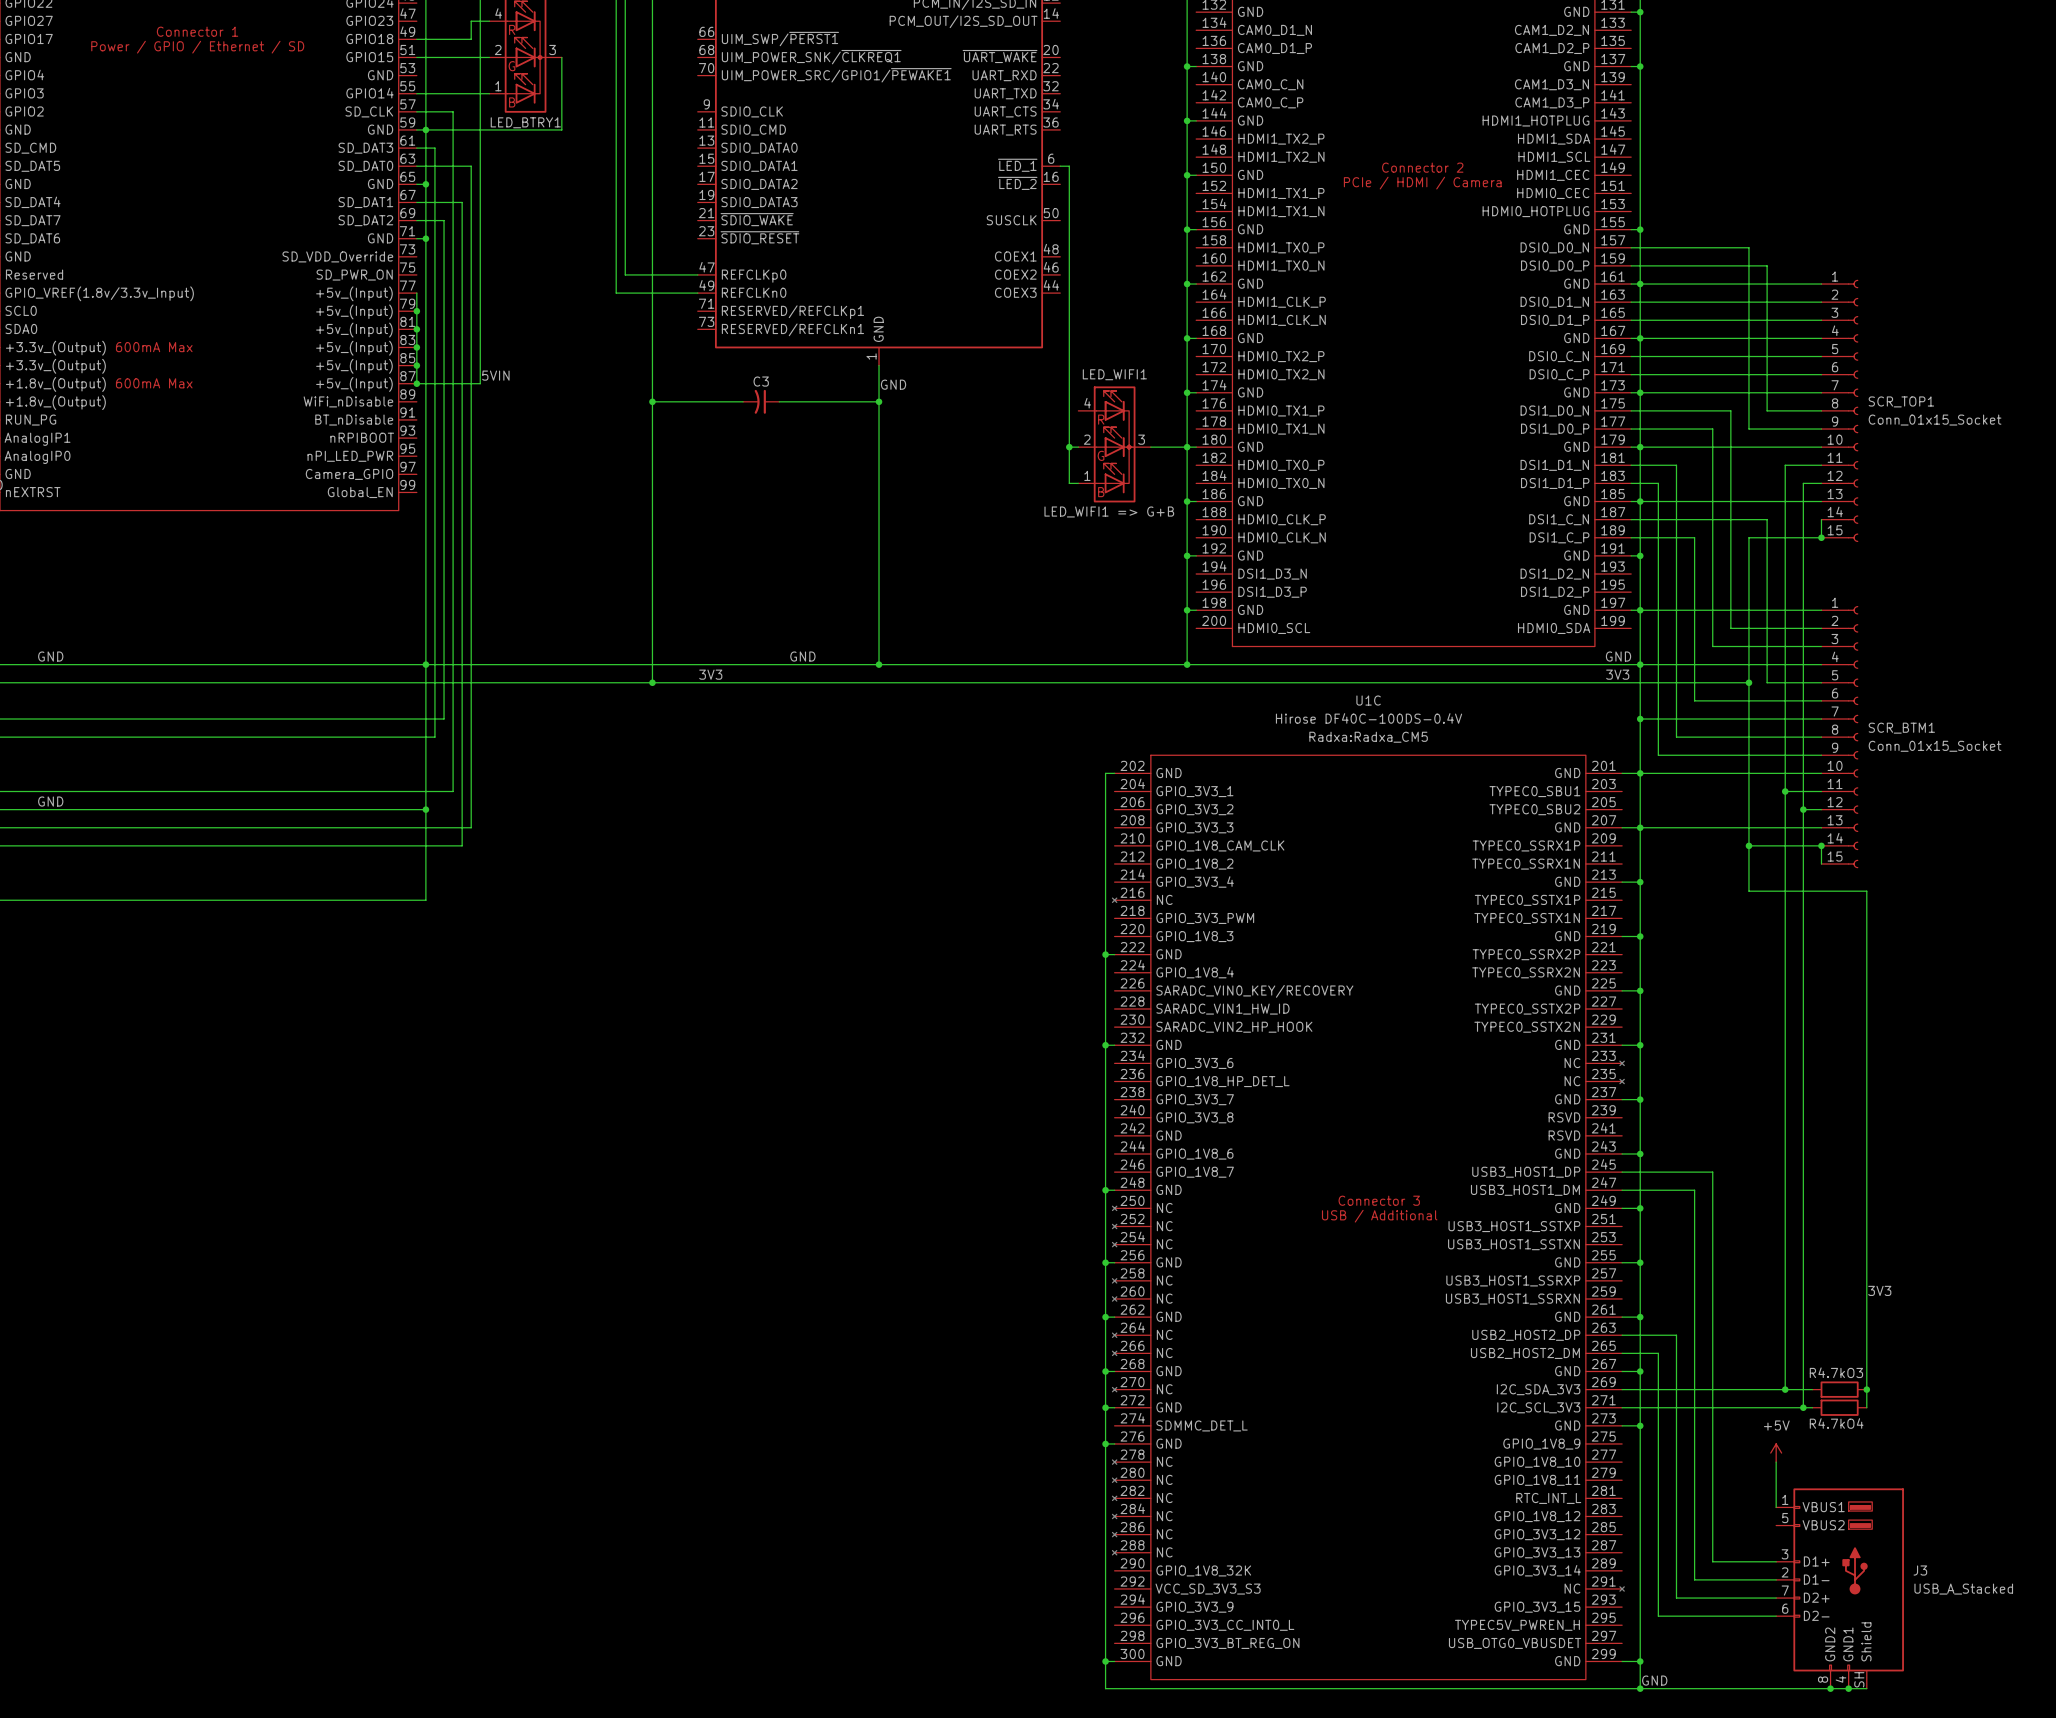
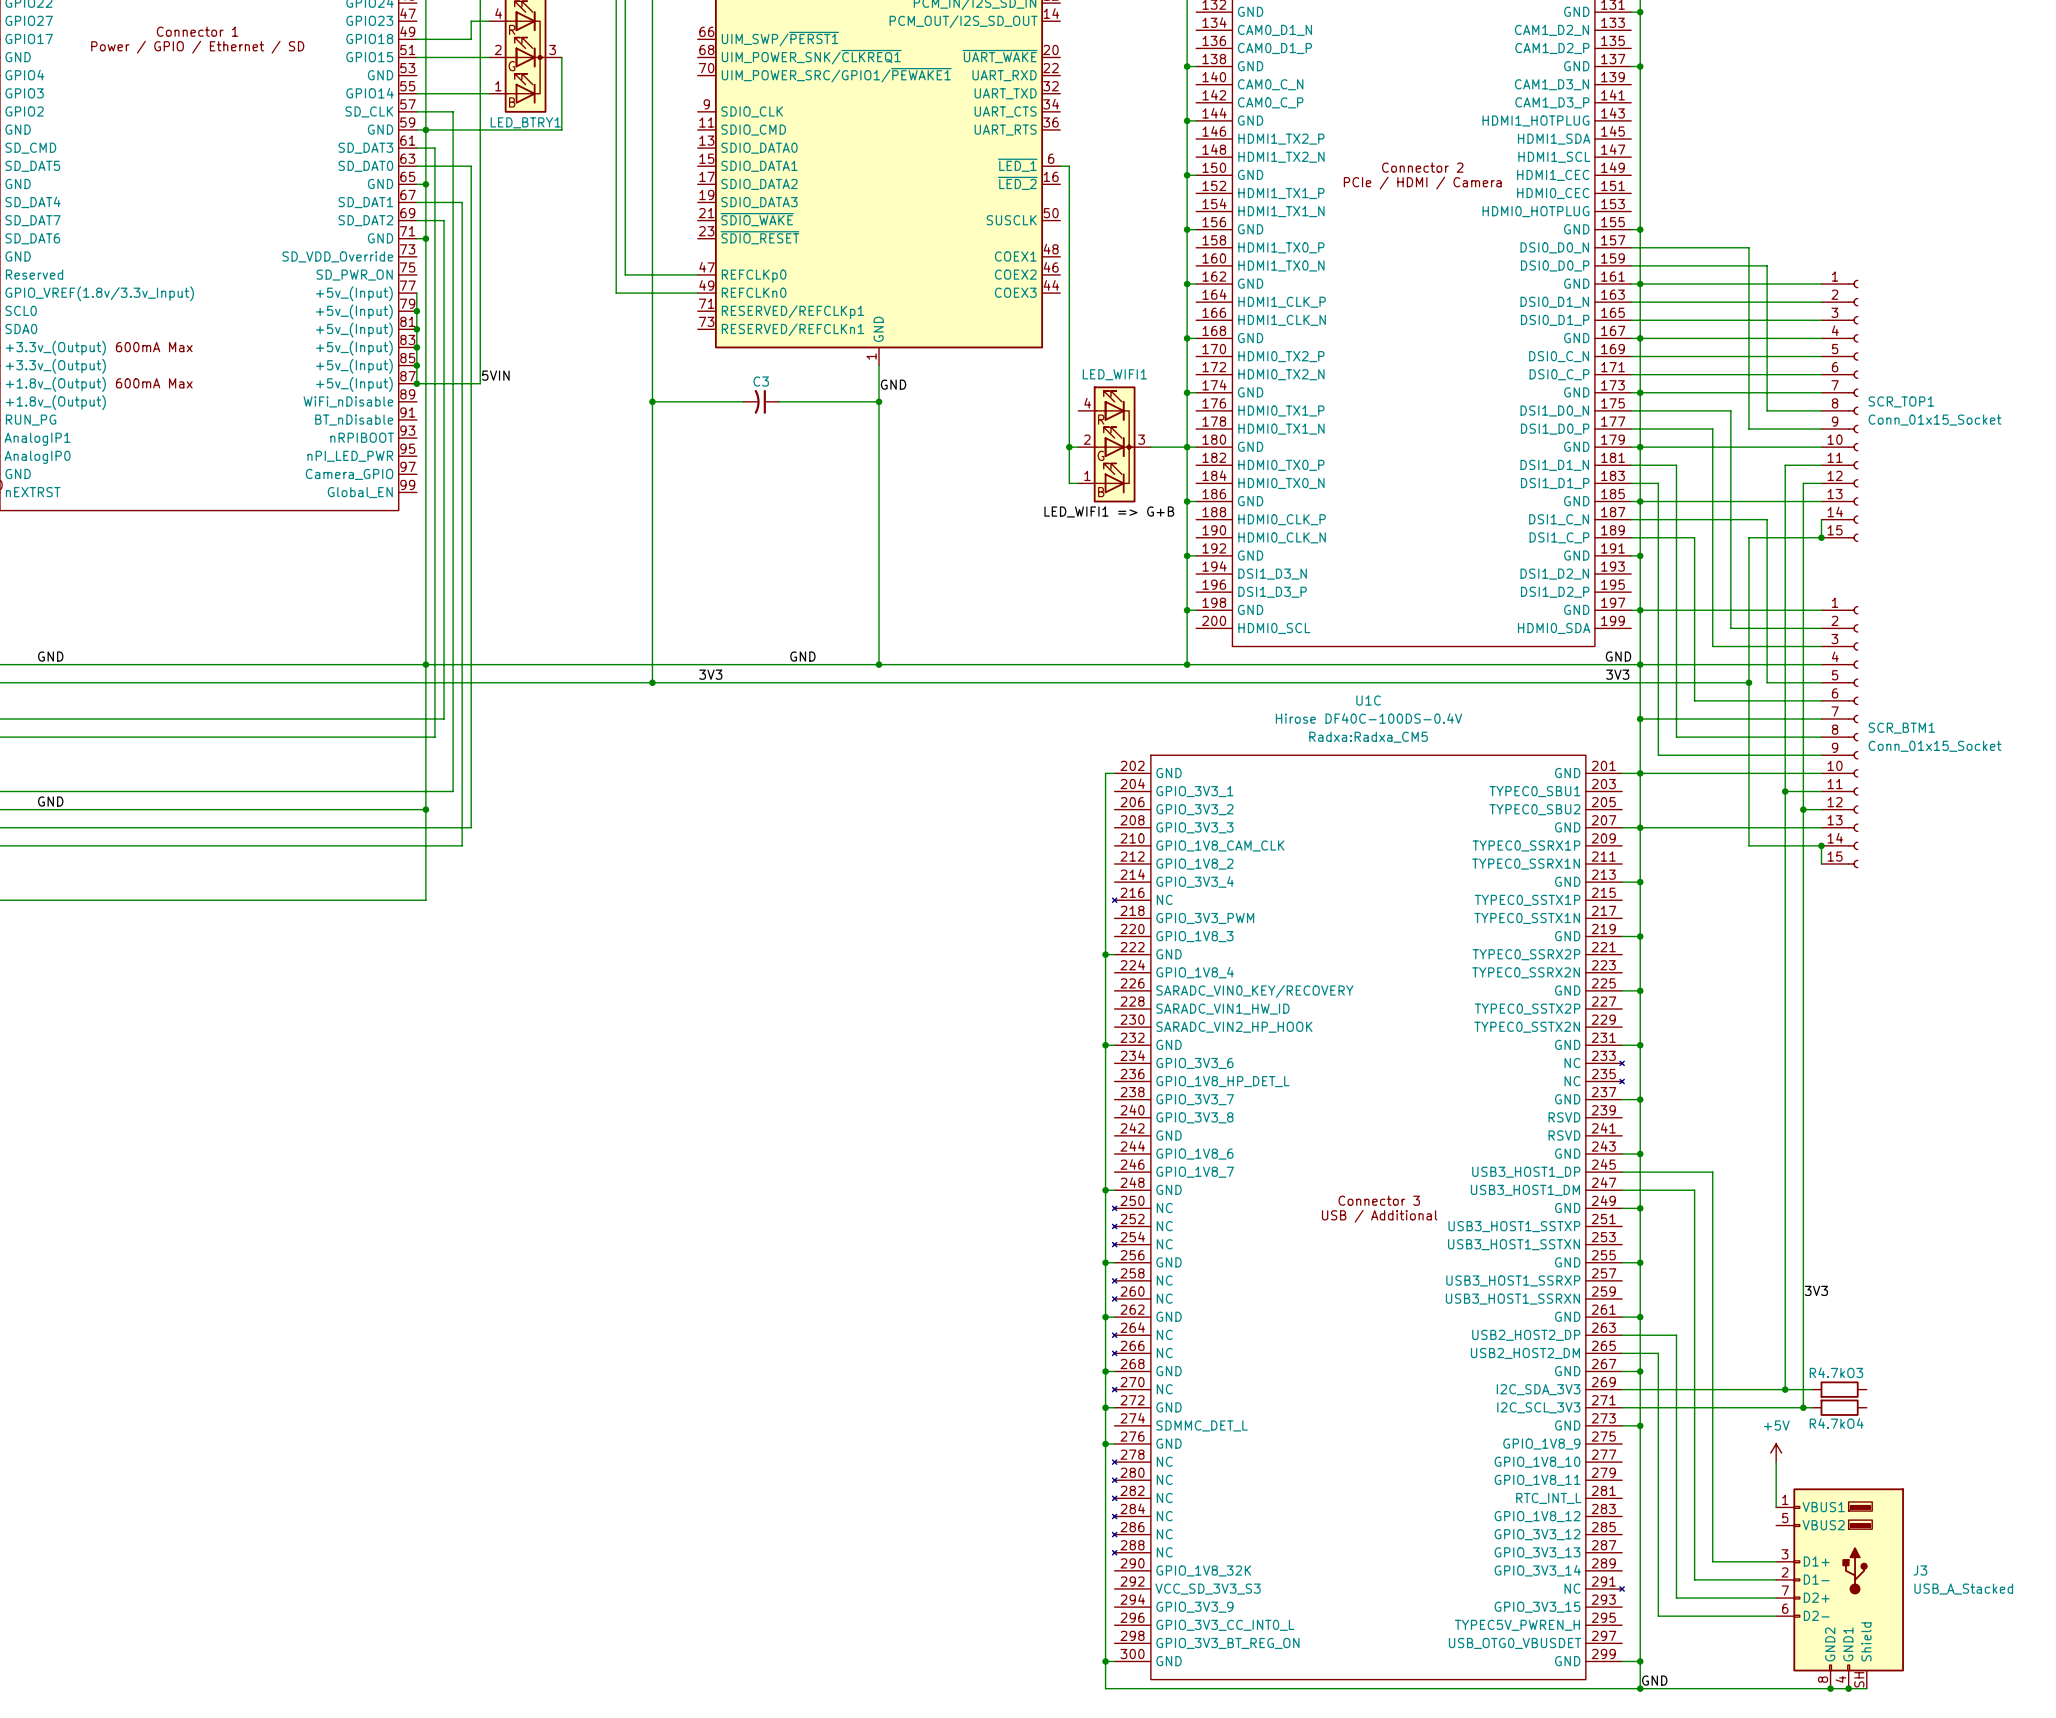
wire: (1748, 845) (1748, 891) (1866, 891) (1866, 1407) -> none
junction: (1748, 845) -> none
label position: 3V3 (1879, 1290) -> 3V3 (1816, 1290)
junction: (1866, 1389) -> none

